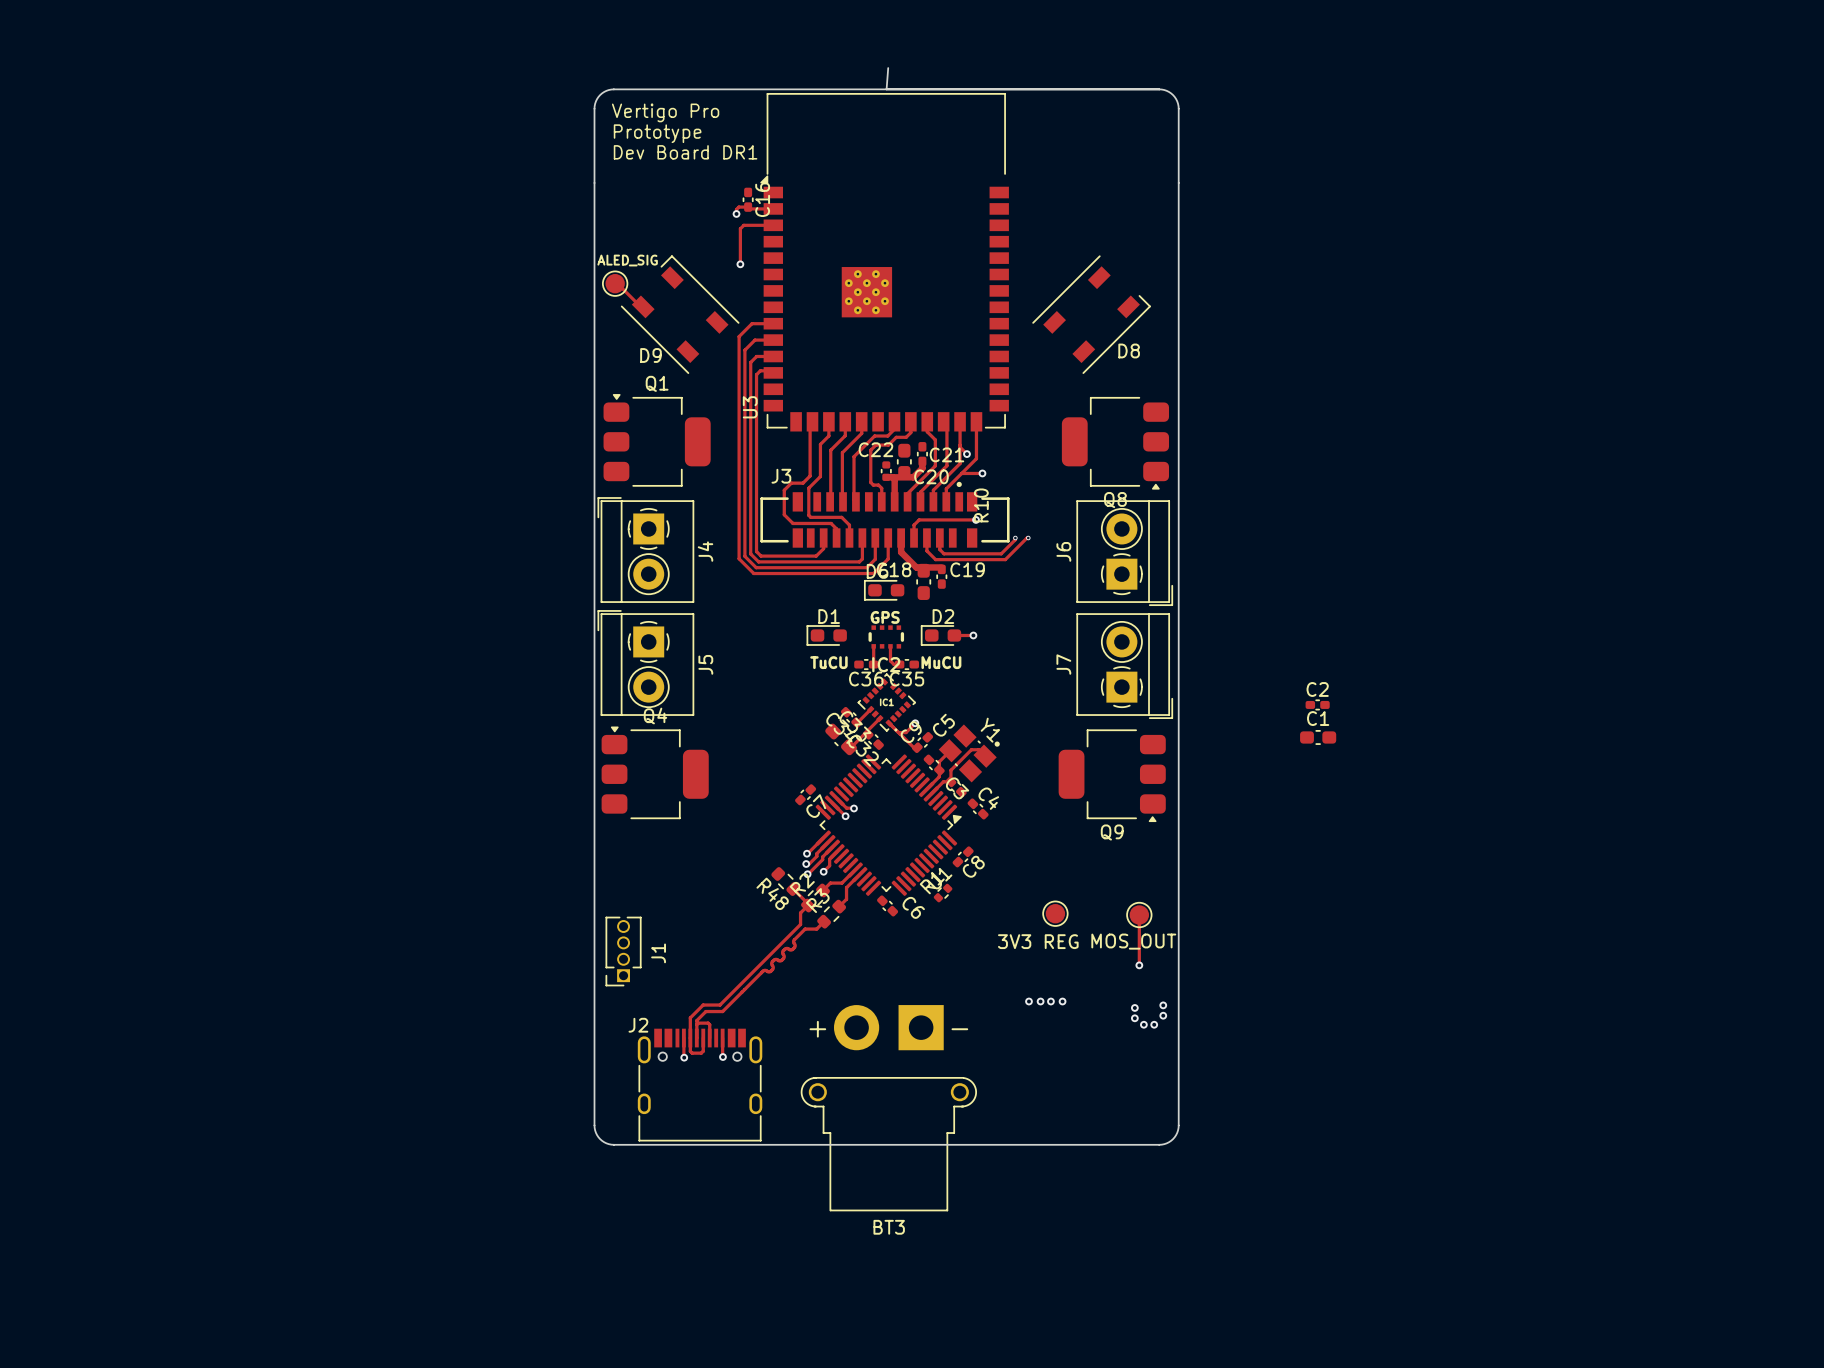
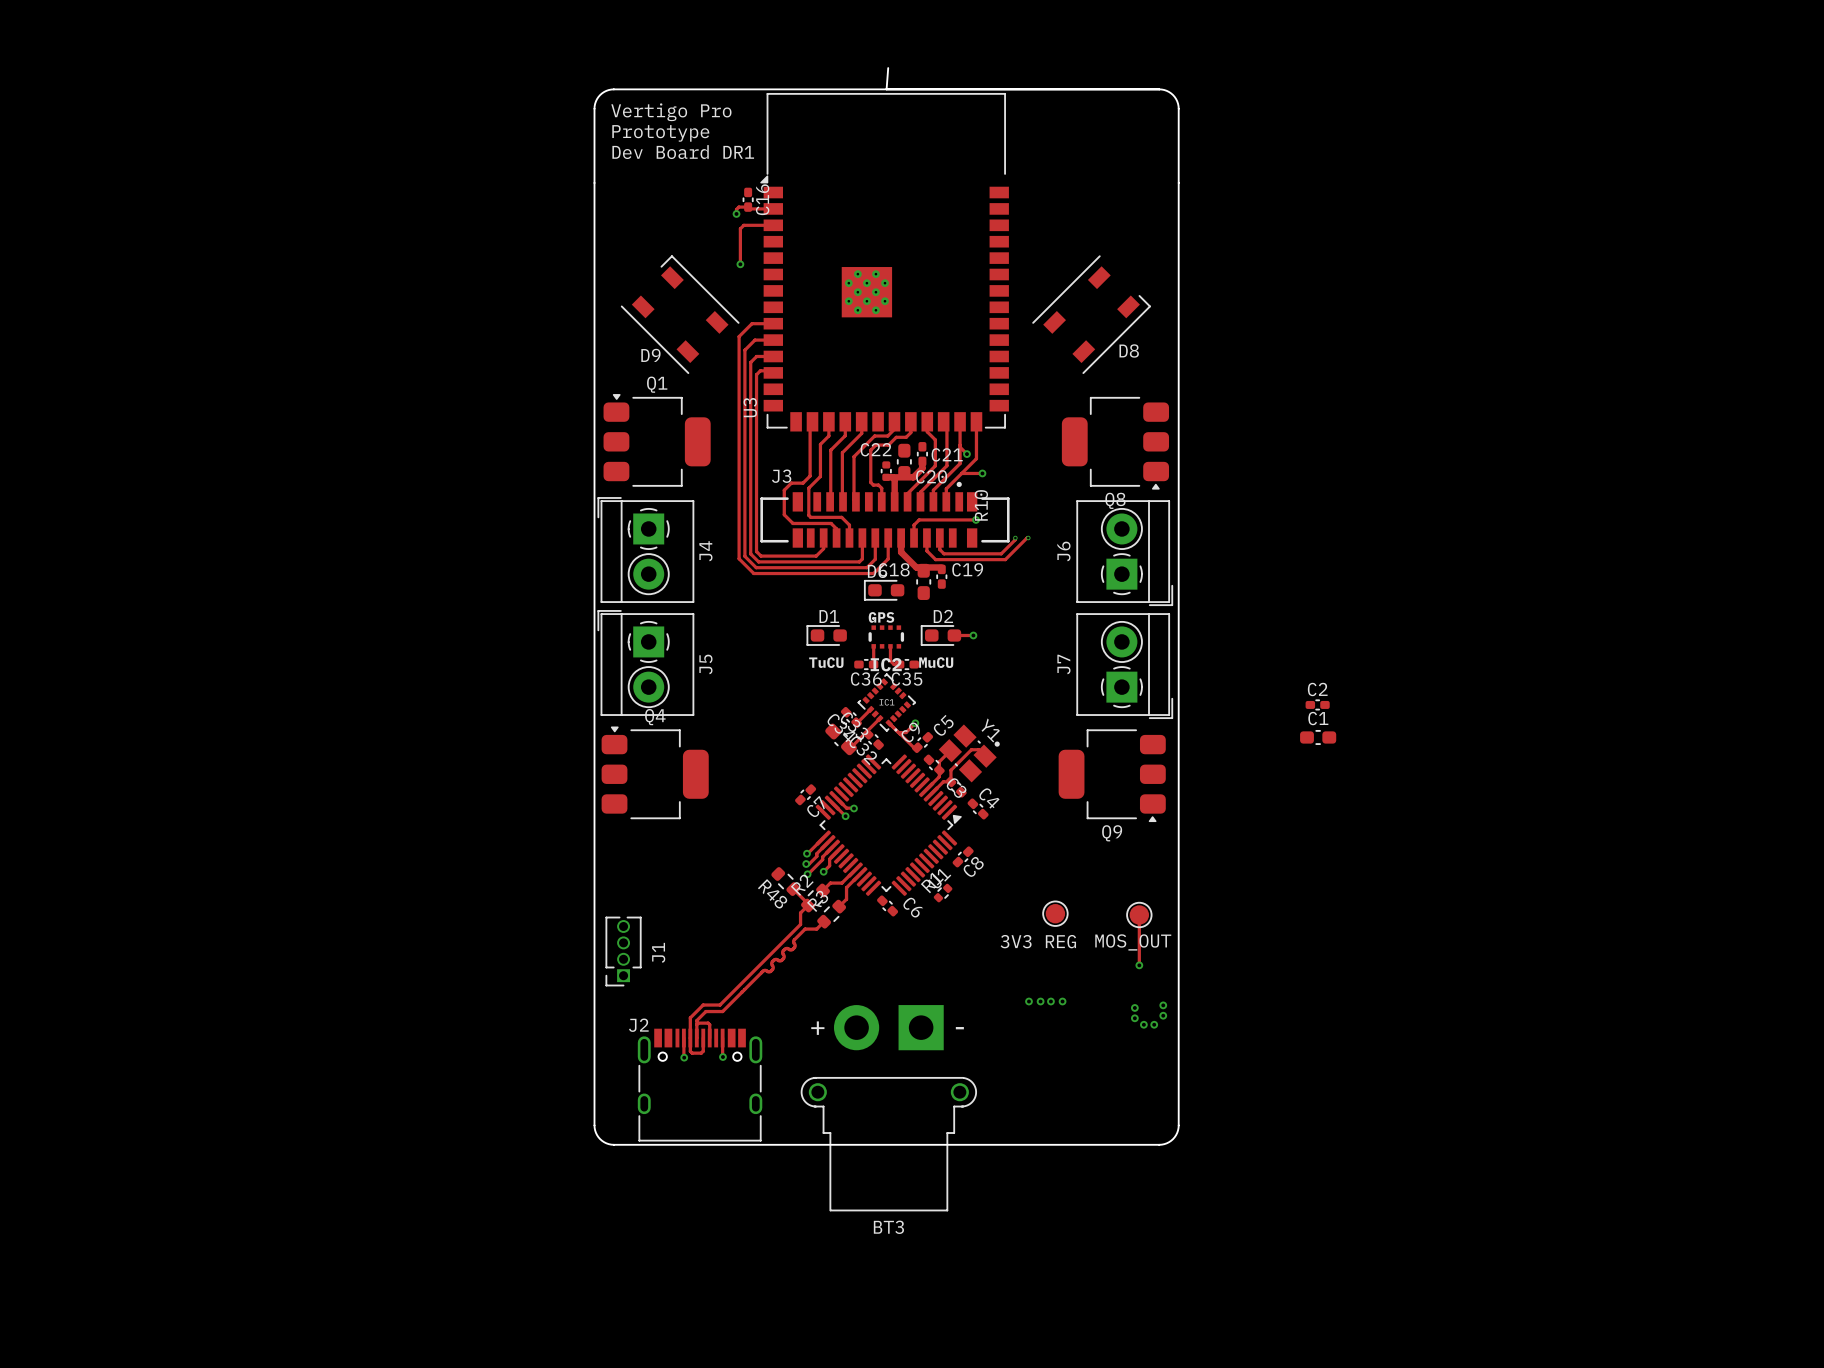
track: (615, 283) (617, 283) (640, 306) (643, 306) -> none
ALED_SIG: (615, 283) -> none

